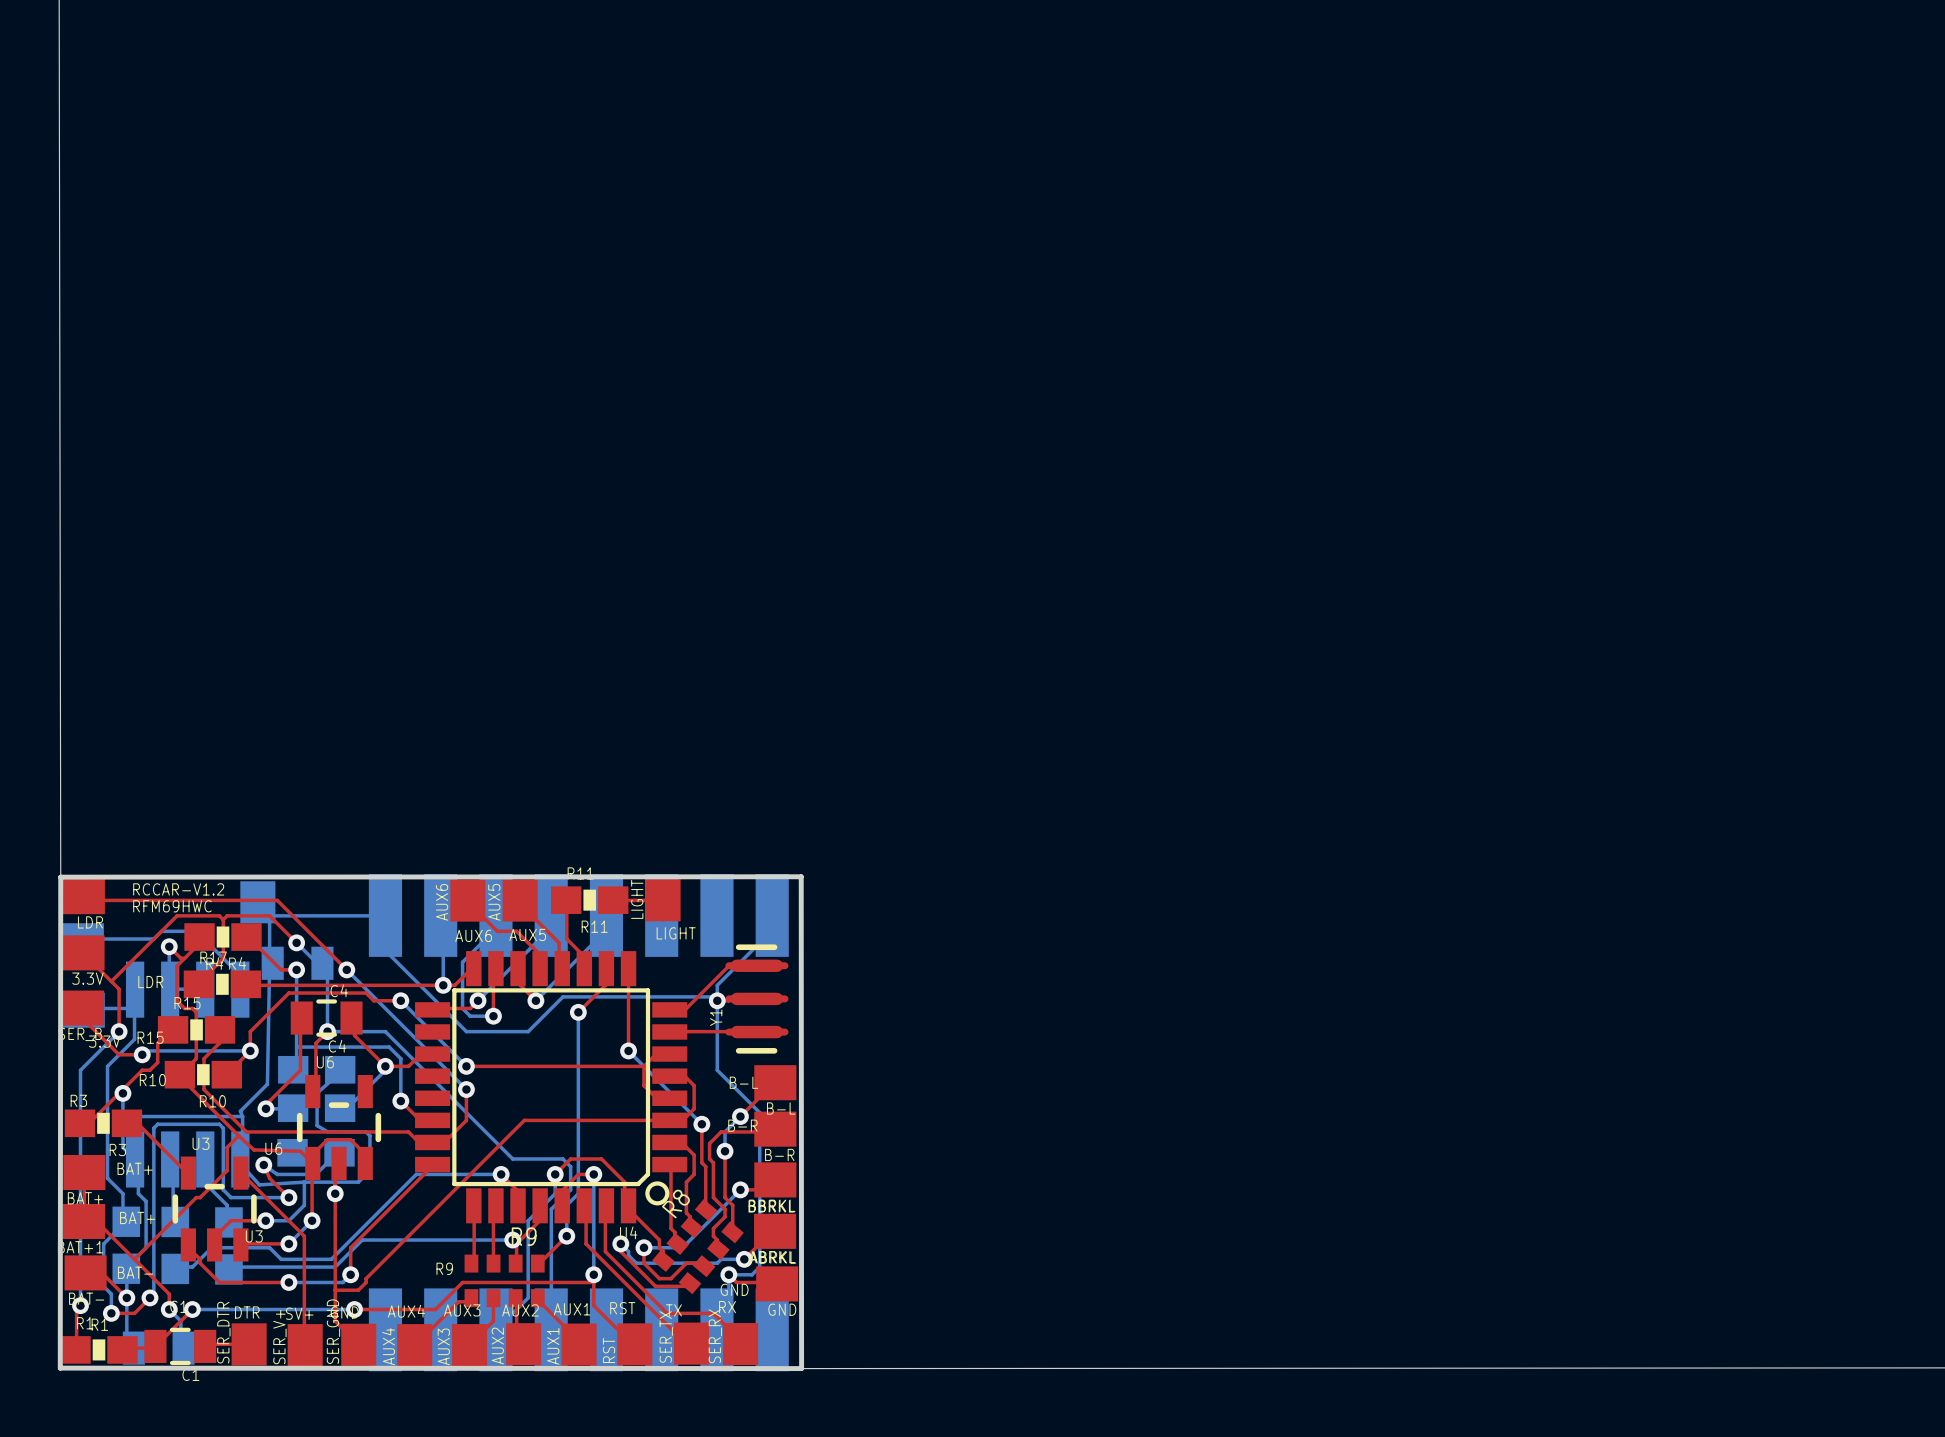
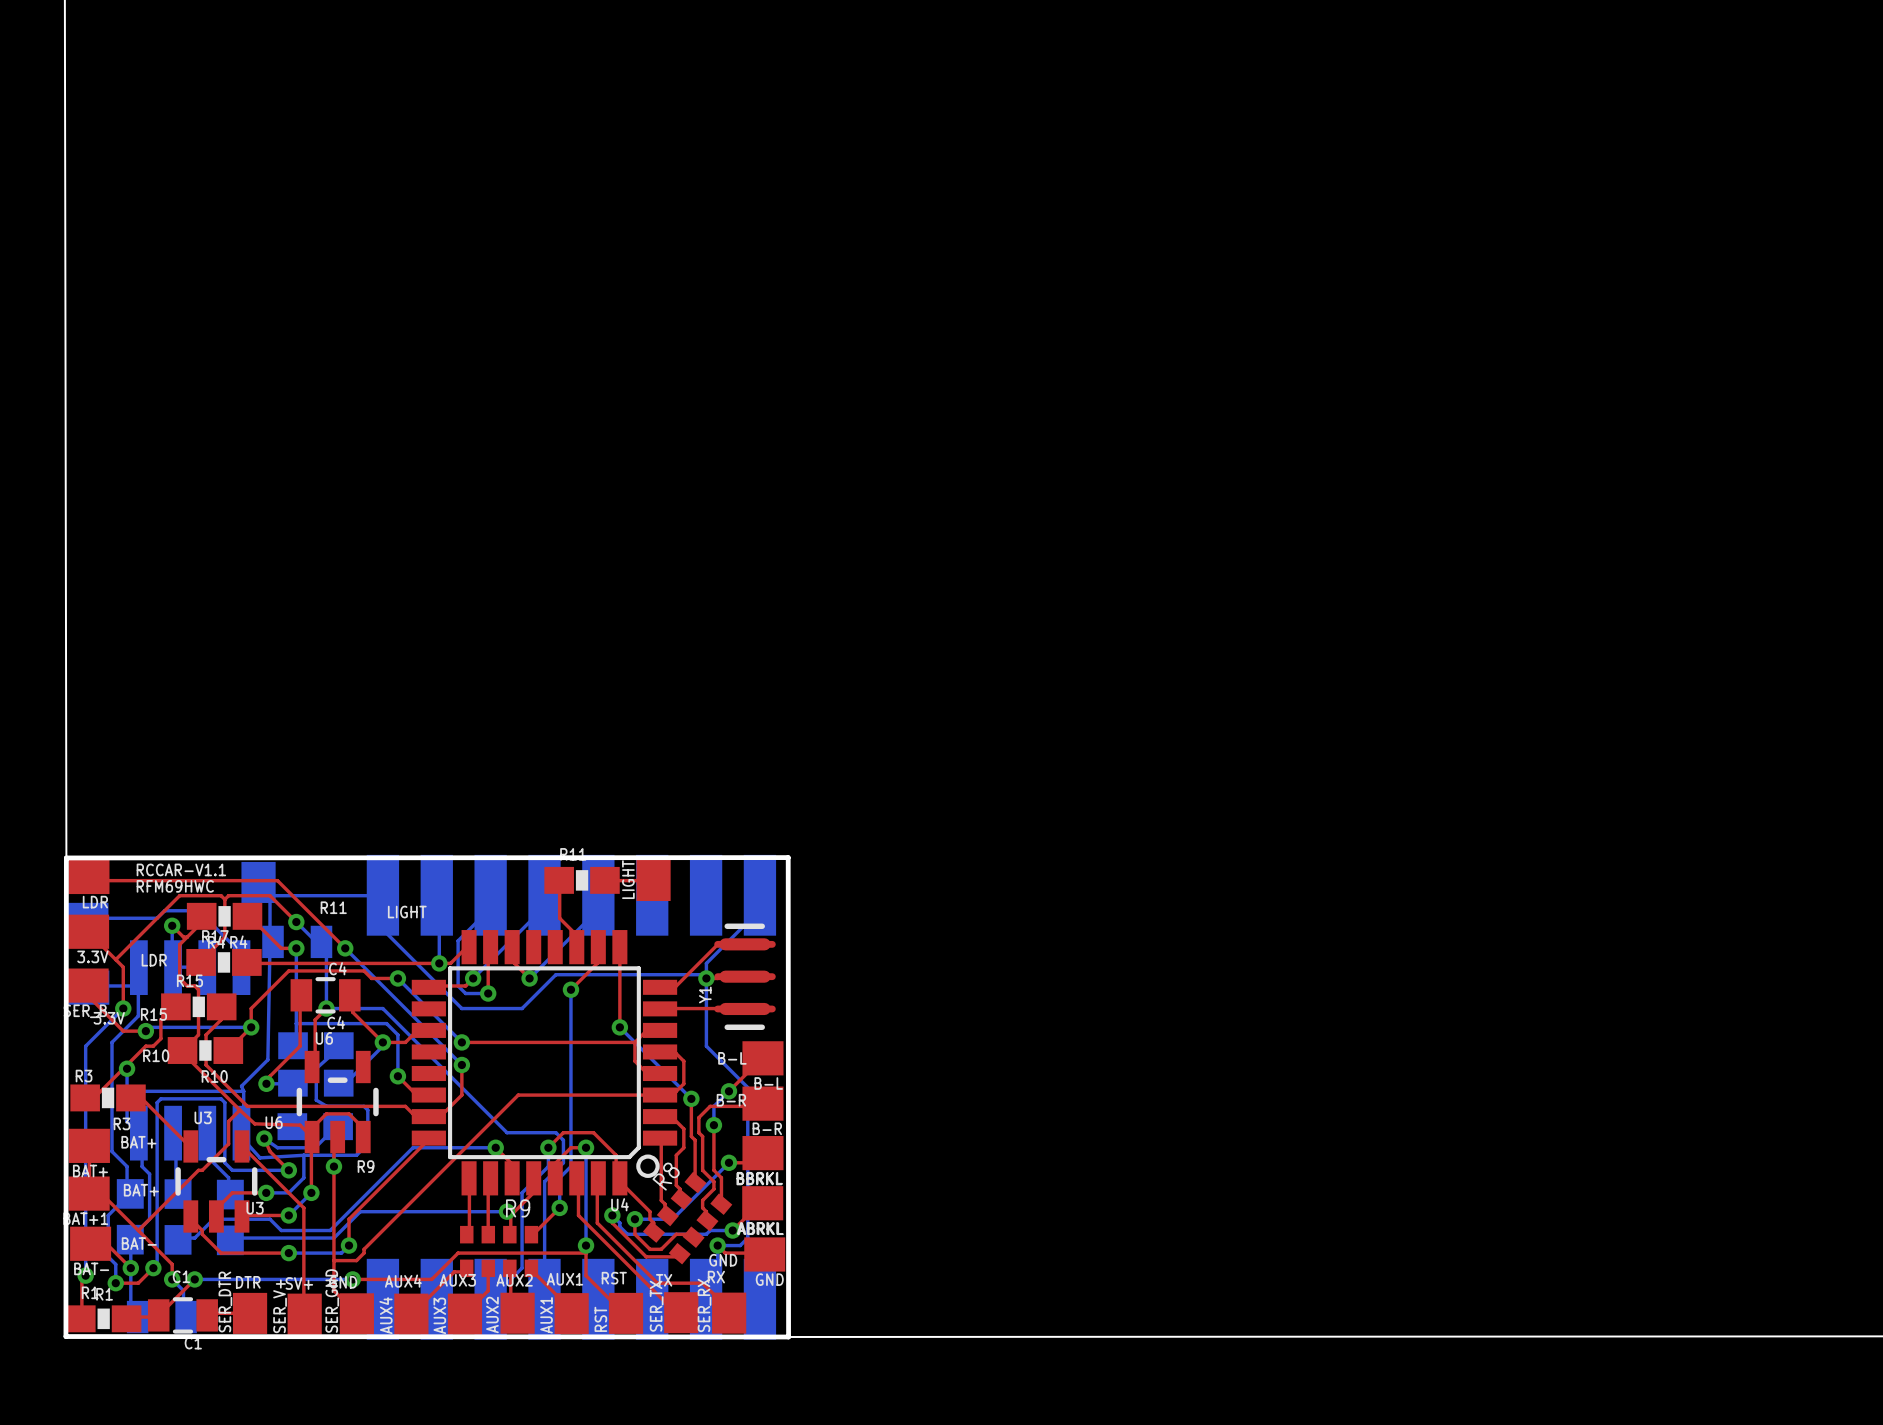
text: RCCAR-V1.2 (178, 889) -> RCCAR-V1.1 (181, 869)
top track: (467, 900) (497, 931) (516, 931) (539, 954) (540, 968) -> none
AUX6: (467, 900) -> none
top track: (520, 900) (520, 904) (559, 942) (559, 966) (562, 968) -> none
AUX5: (520, 900) -> none
text position: R11 (594, 926) -> R11 (333, 907)
text position: LIGHT (676, 933) -> LIGHT (407, 912)
text: AUX5 (527, 934) -> none
text: AUX6 (473, 935) -> none
text position: R9 (444, 1268) -> R9 (366, 1166)

